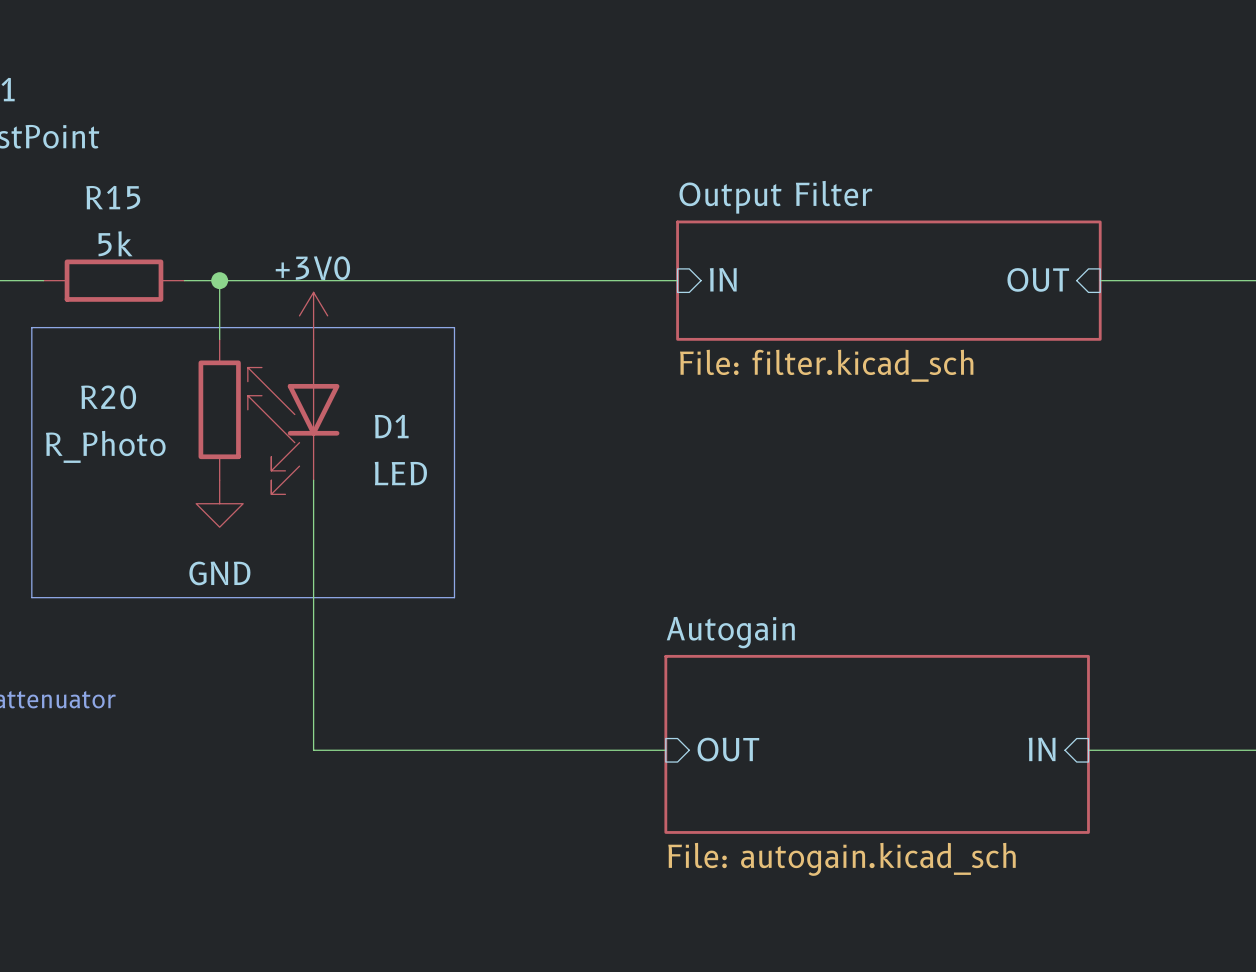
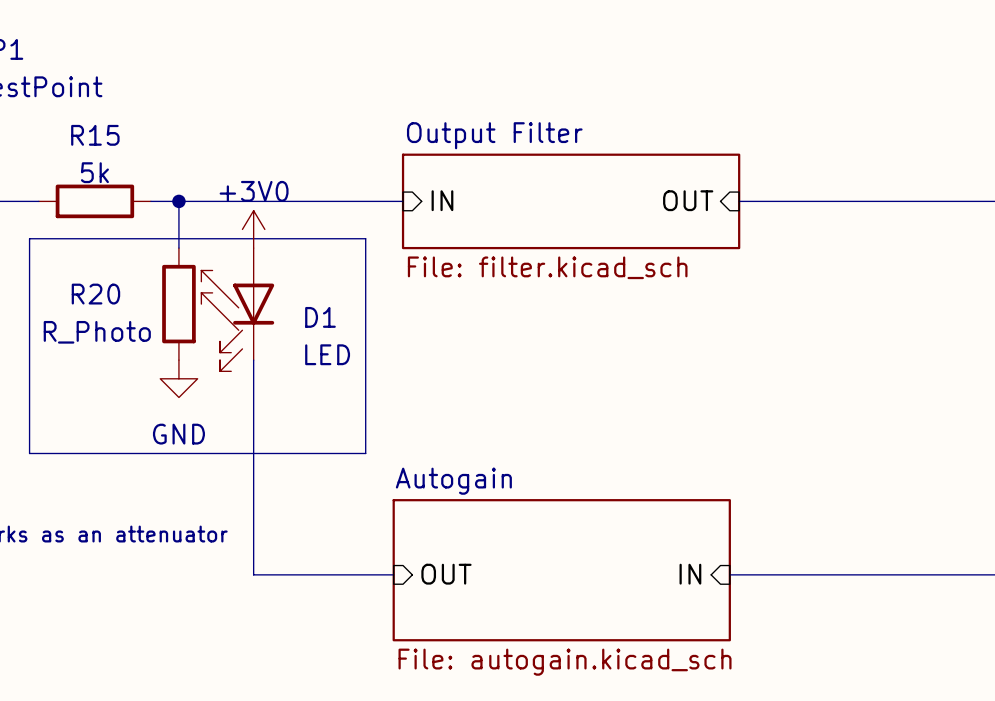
sheet pin position: IN (723, 279) -> IN (442, 200)
sheet pin position: OUT (1038, 279) -> OUT (688, 200)
wire: (501, 280) (677, 280) -> (739, 201) (879, 201)
sheet Output Filter position: (888, 280) -> (571, 201)
sheet Autogain position: (877, 744) -> (561, 570)
sheet pin position: OUT (728, 749) -> OUT (446, 574)
sheet pin position: IN (1042, 749) -> IN (690, 574)
wire: (489, 750) (665, 750) -> (729, 574) (869, 574)

